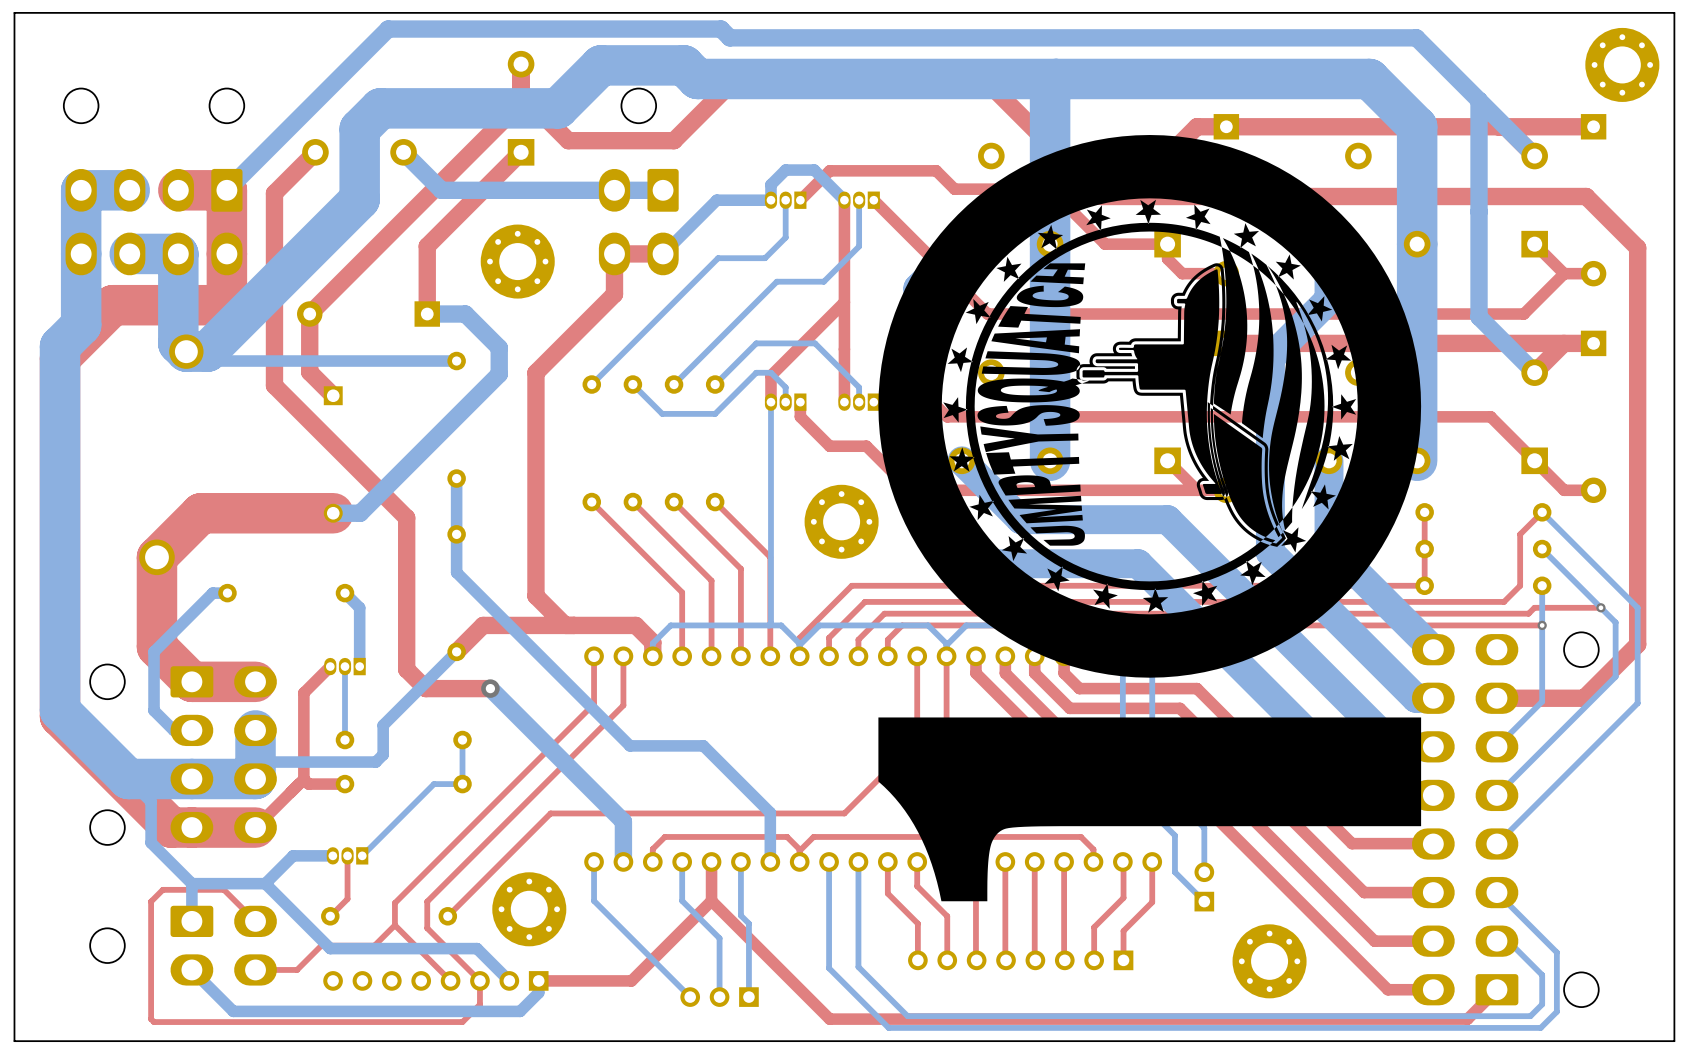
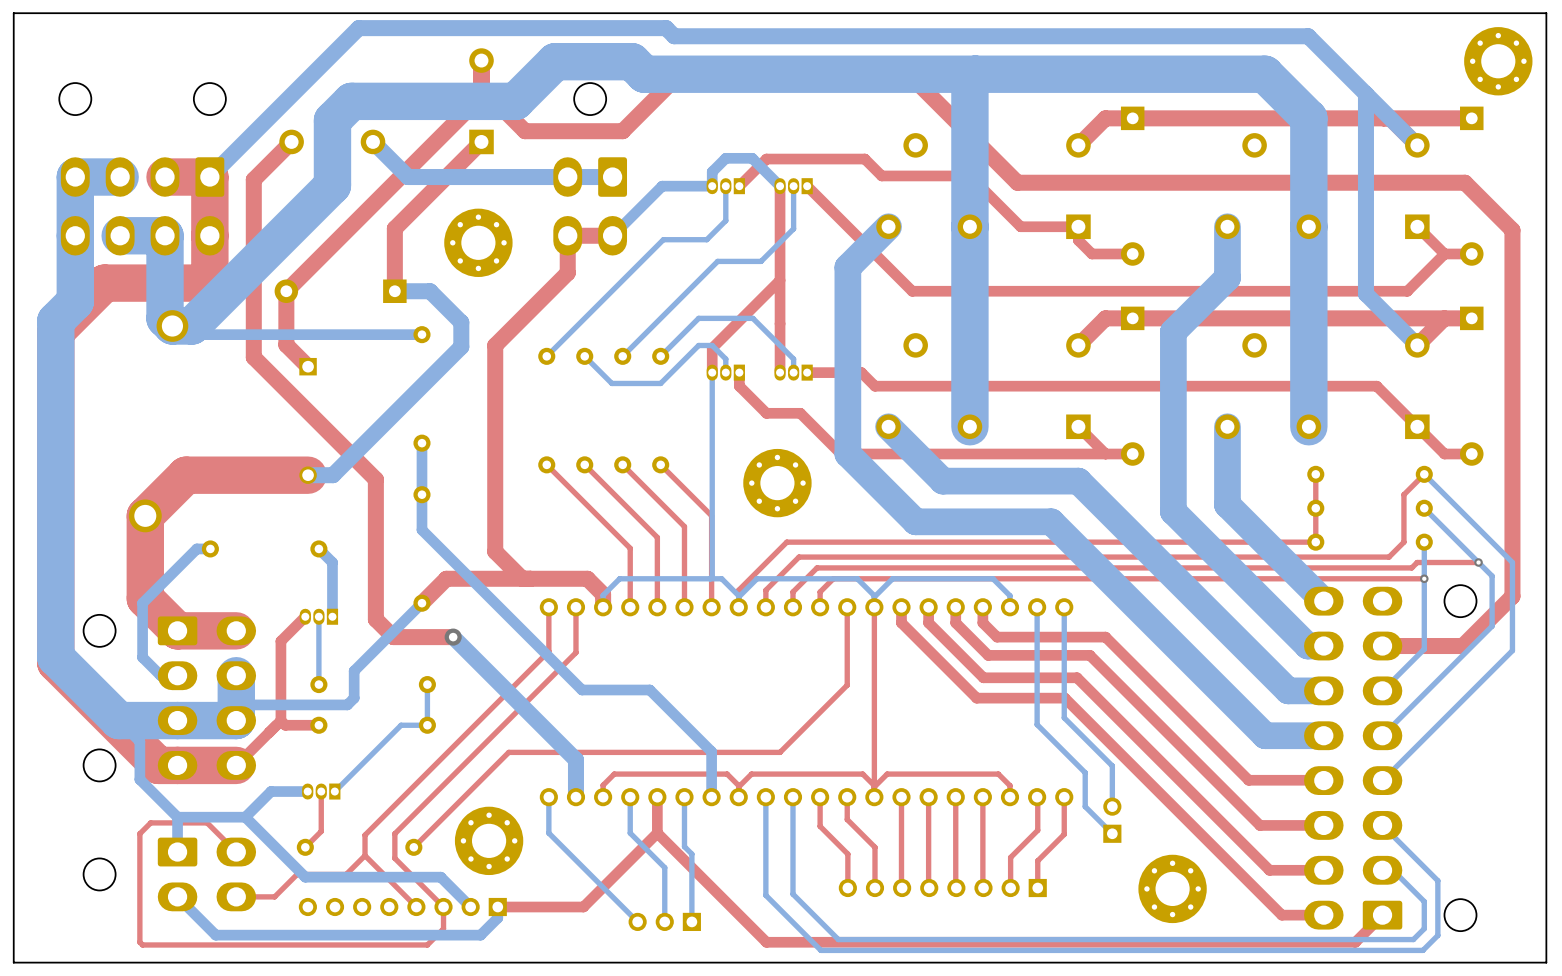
drawing: [878, 135, 1422, 678] -> none
drawing: [878, 717, 1422, 902] -> none

